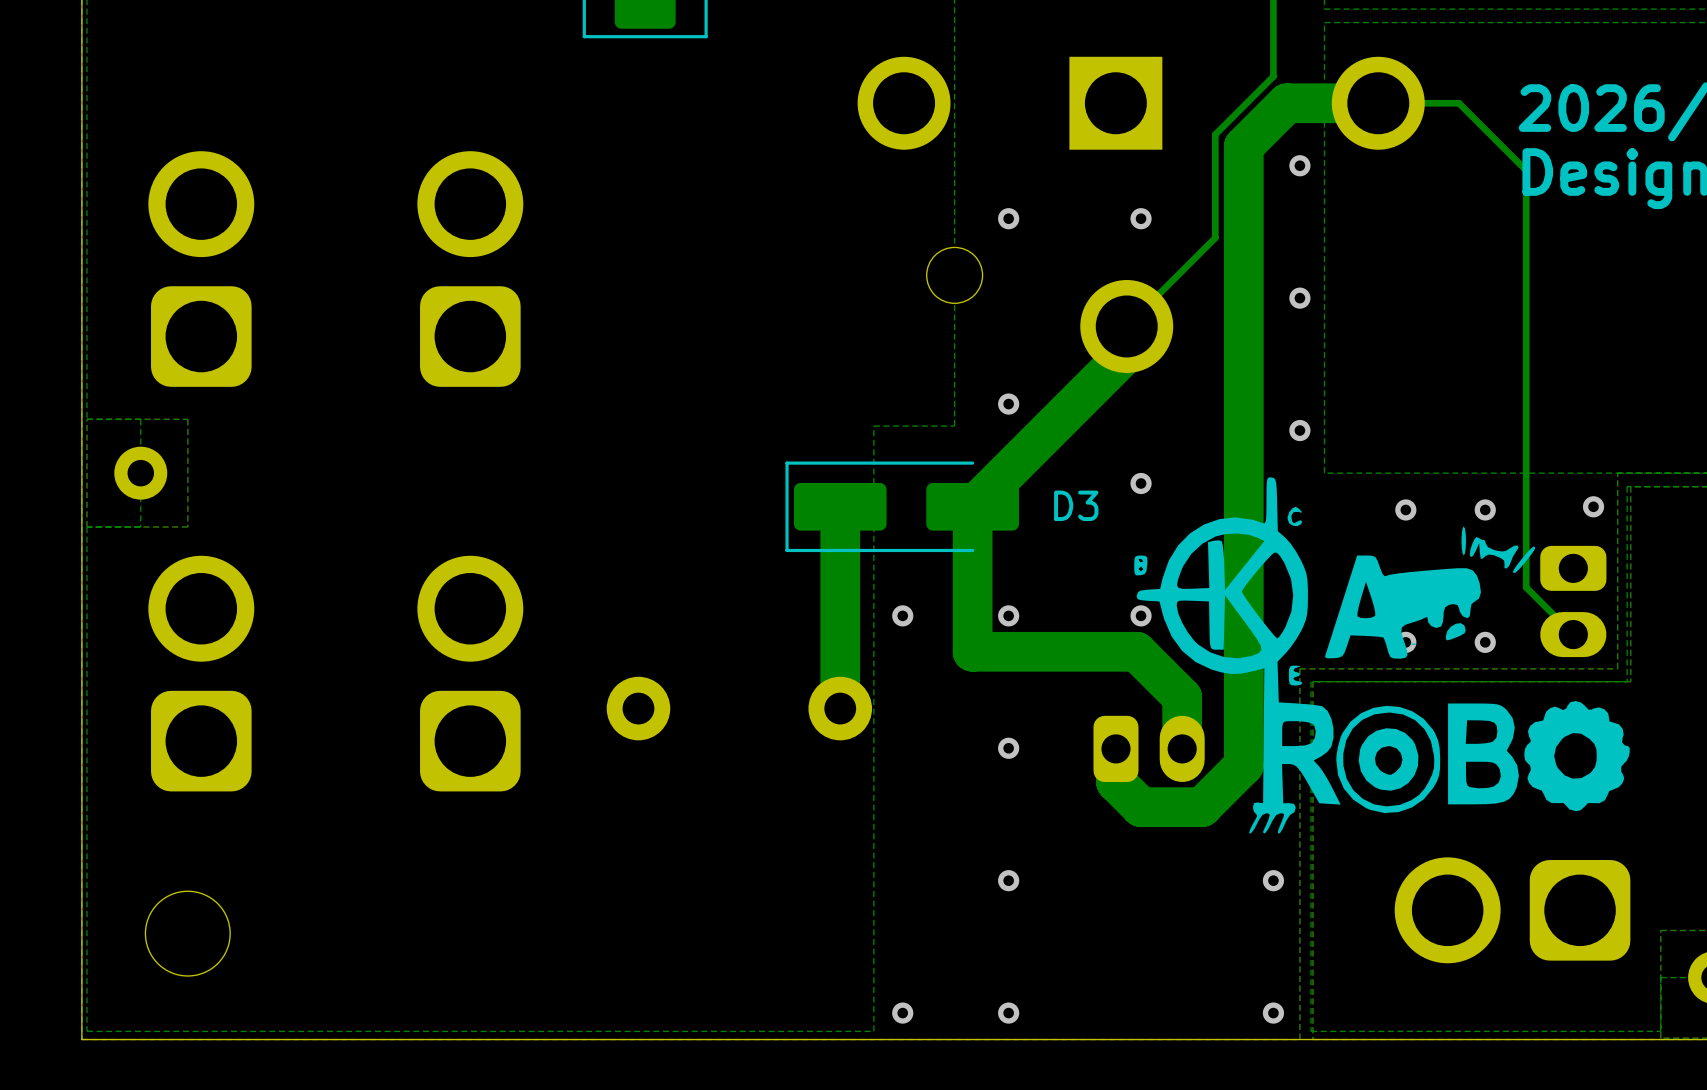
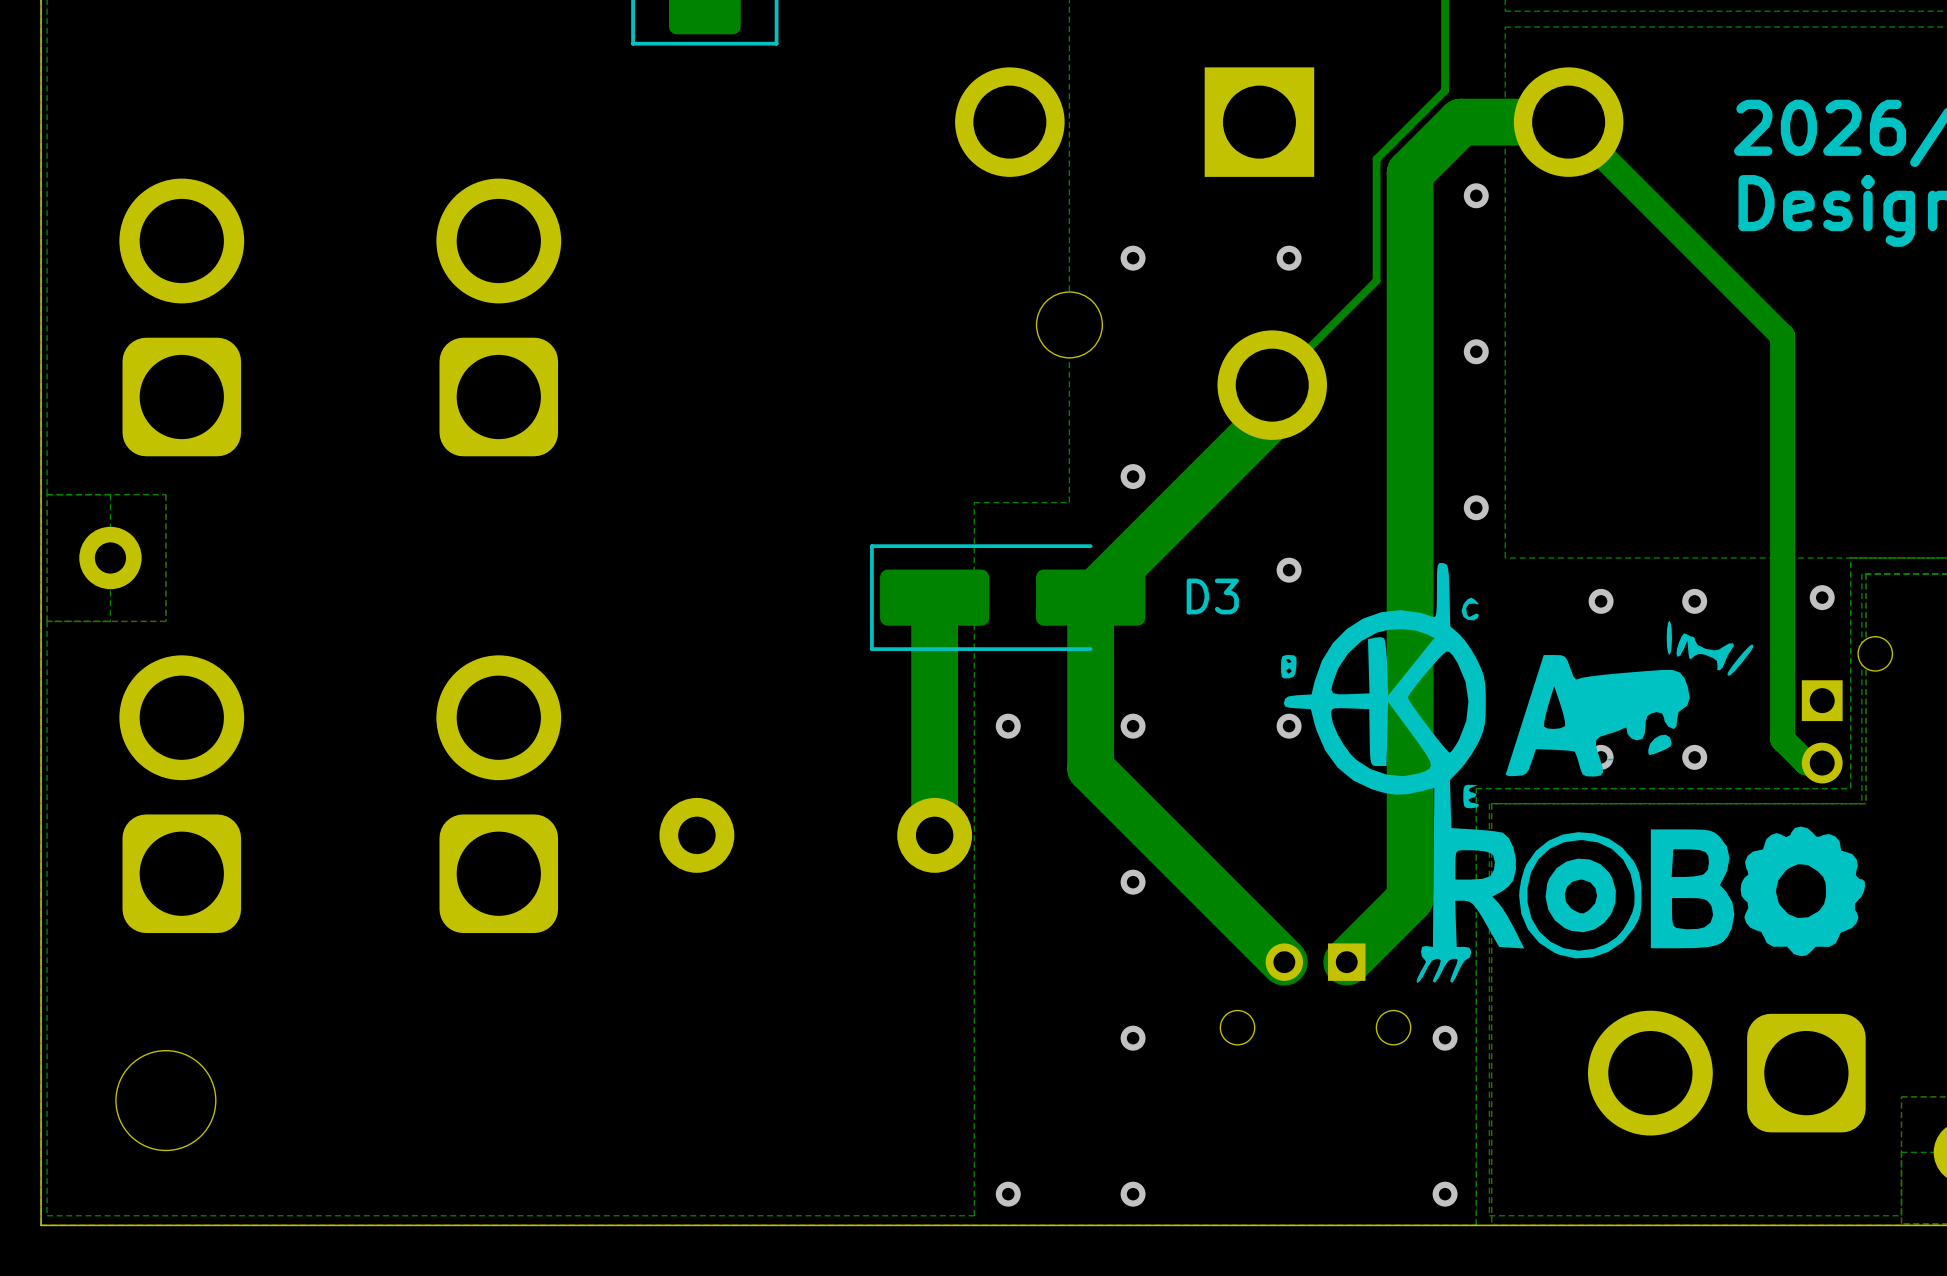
bottom track: (1378, 103) (1459, 103) (1526, 170) (1526, 587) (1573, 634) -> (1568, 122) (1782, 336) (1782, 739) (1806, 763) (1822, 763)
part: (1573, 601) -> none
part: none -> (1847, 710)
bottom track: (972, 651) (1136, 651) (1182, 697) (1182, 748) -> (1090, 768) (1284, 962)
bottom track: (1115, 748) (1115, 782) (1141, 807) (1201, 807) (1243, 765) (1243, 762) -> (1346, 962) (1410, 898)
part: (1149, 748) -> none
part: none -> (1315, 994)

